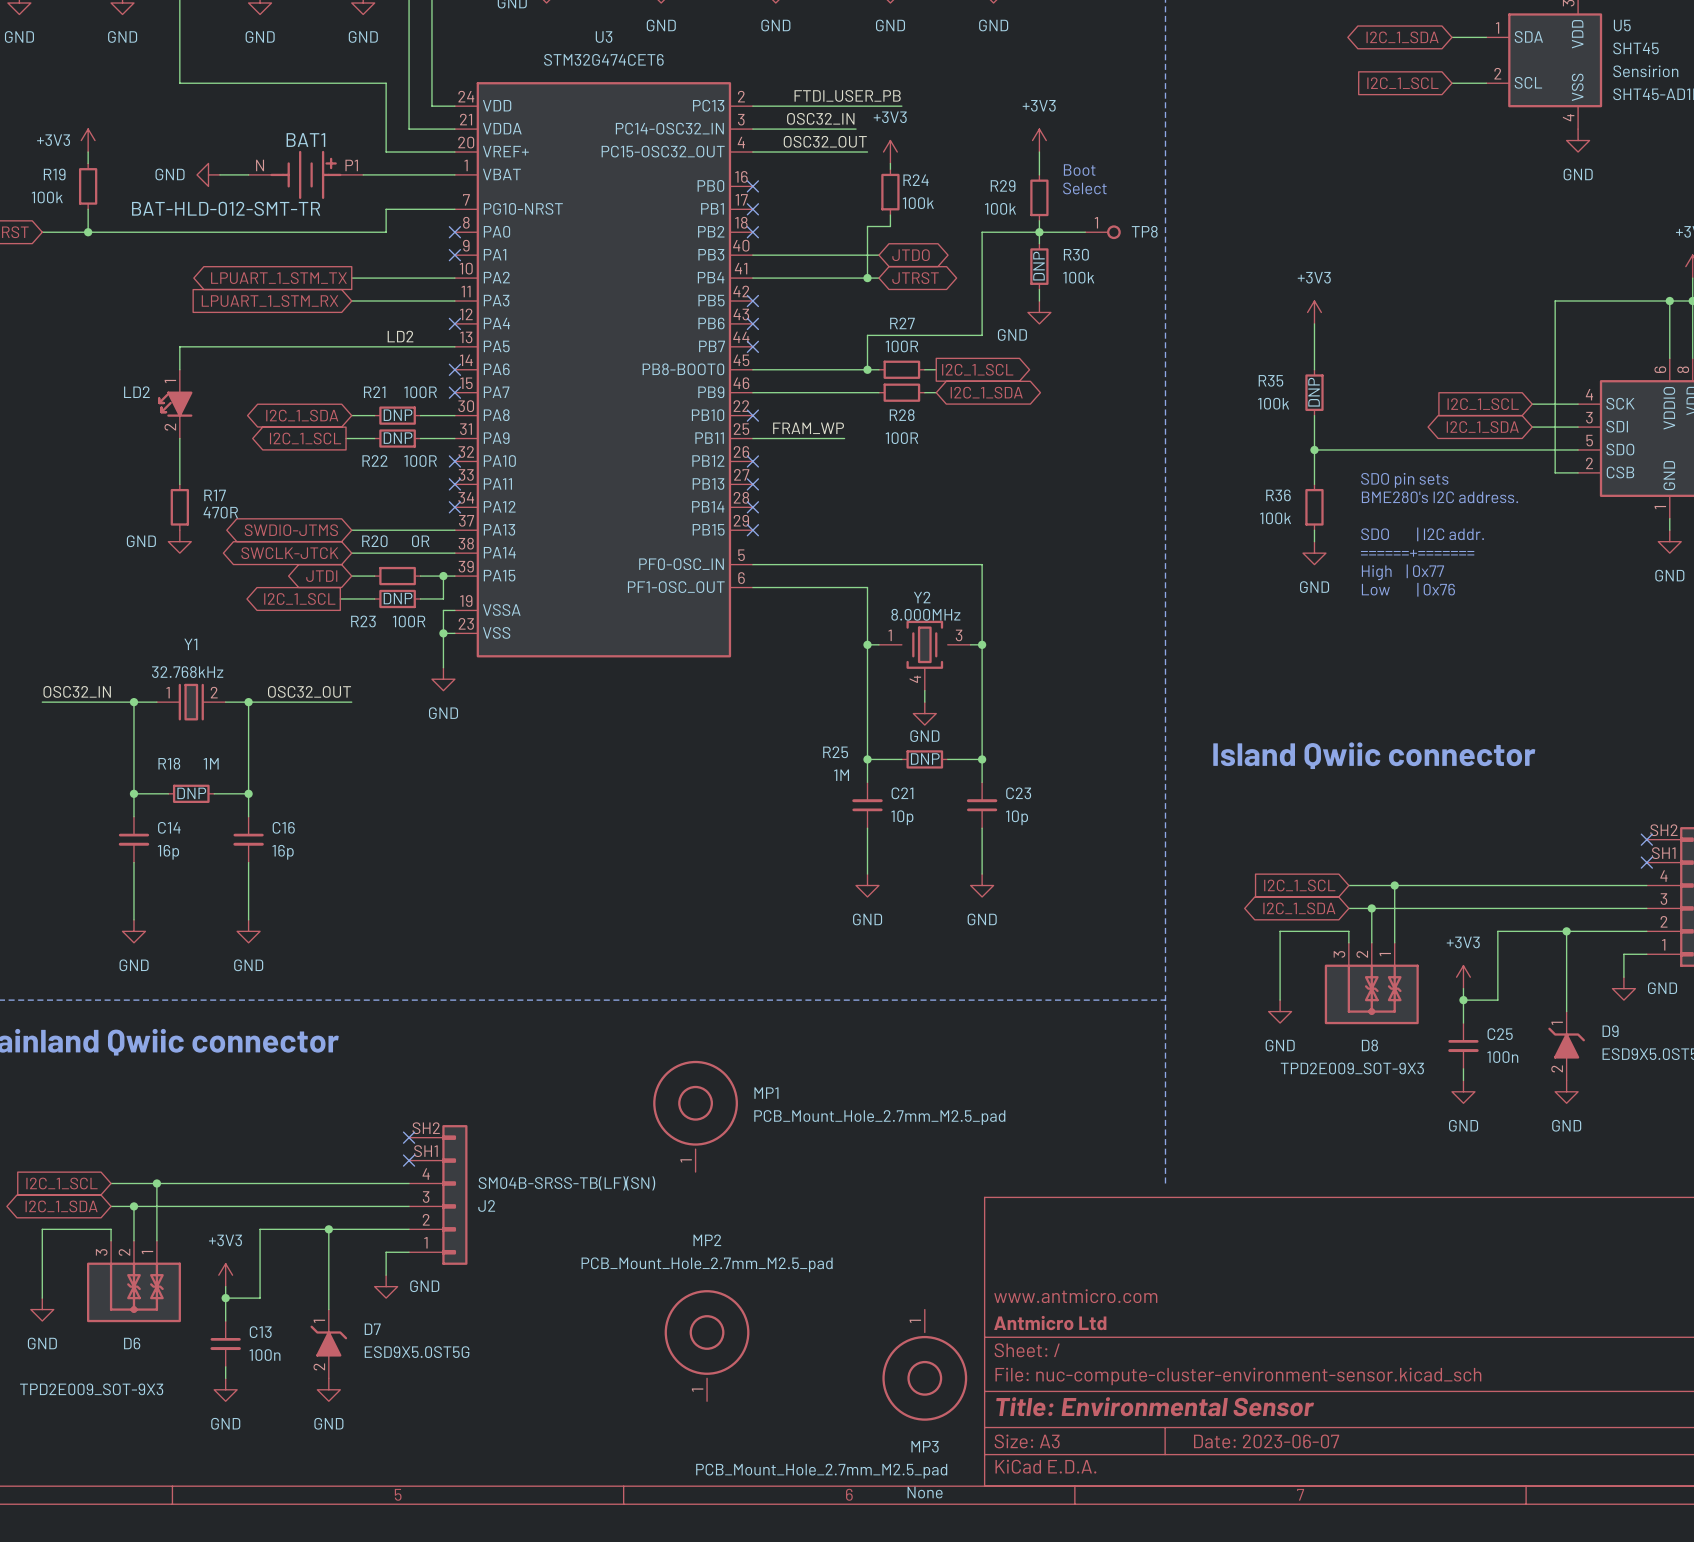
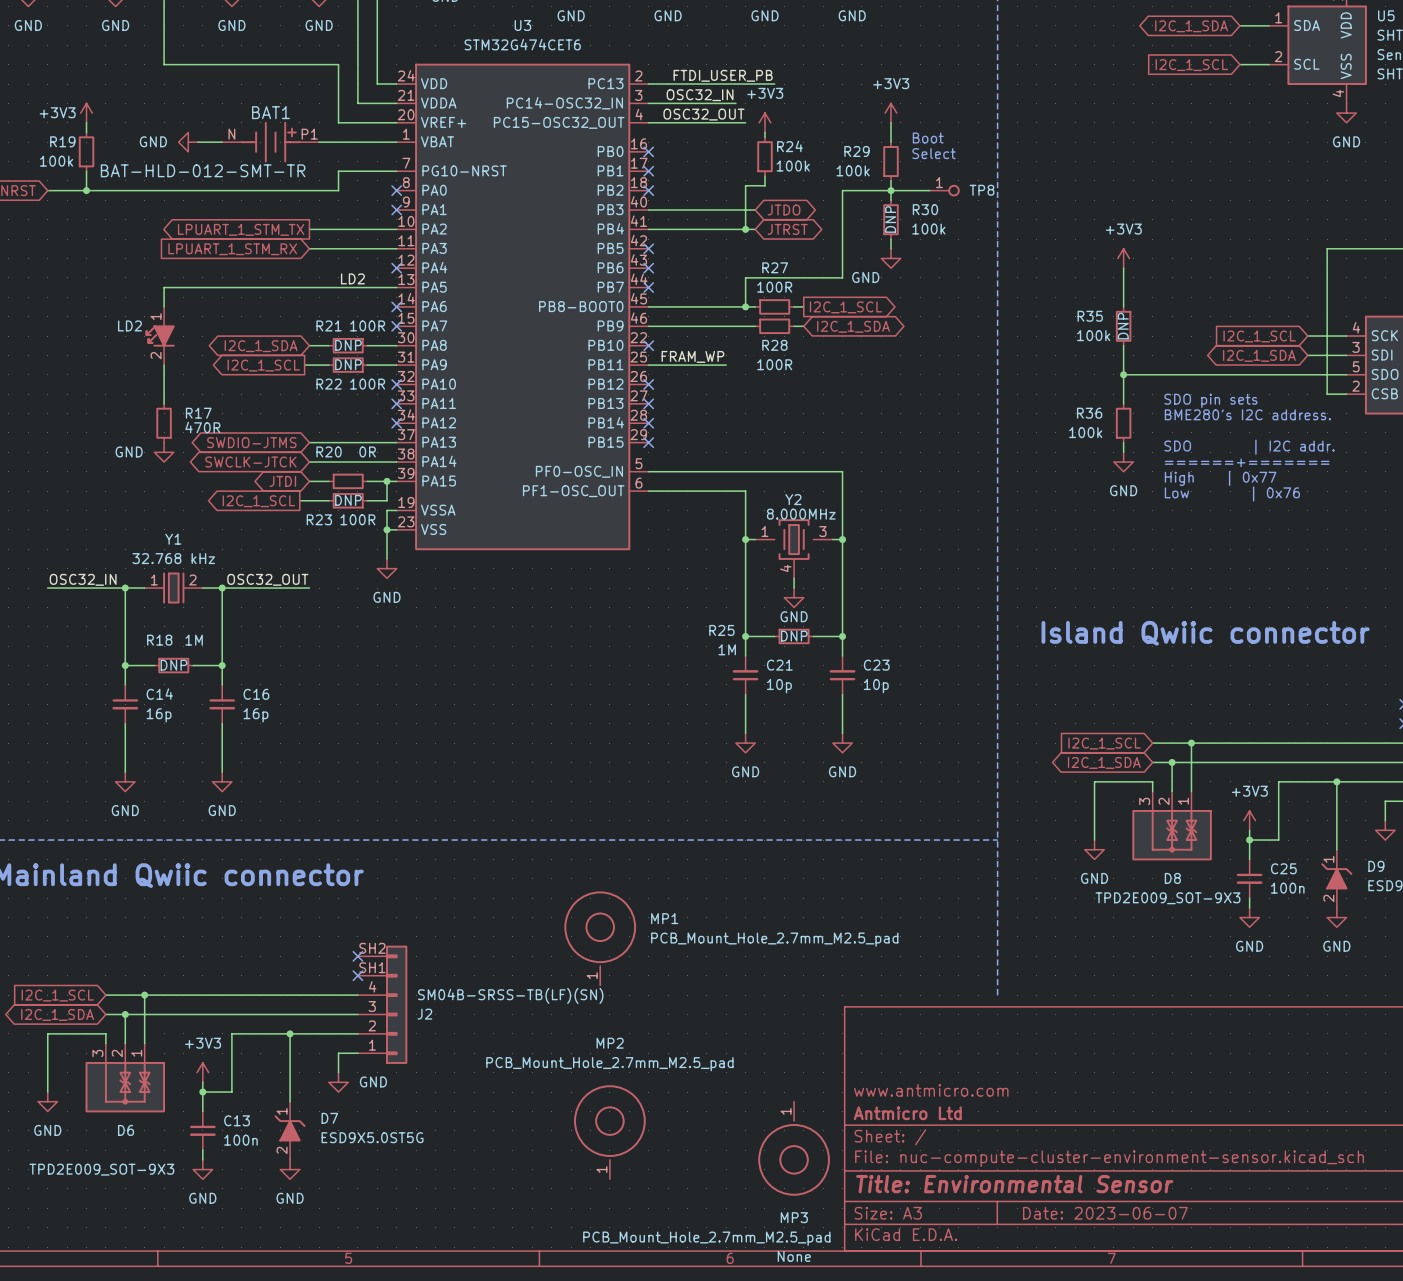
Y1 text: none -> 32.768 kHz (173, 558)
Y1 text: 32.768kHz (187, 672) -> none

